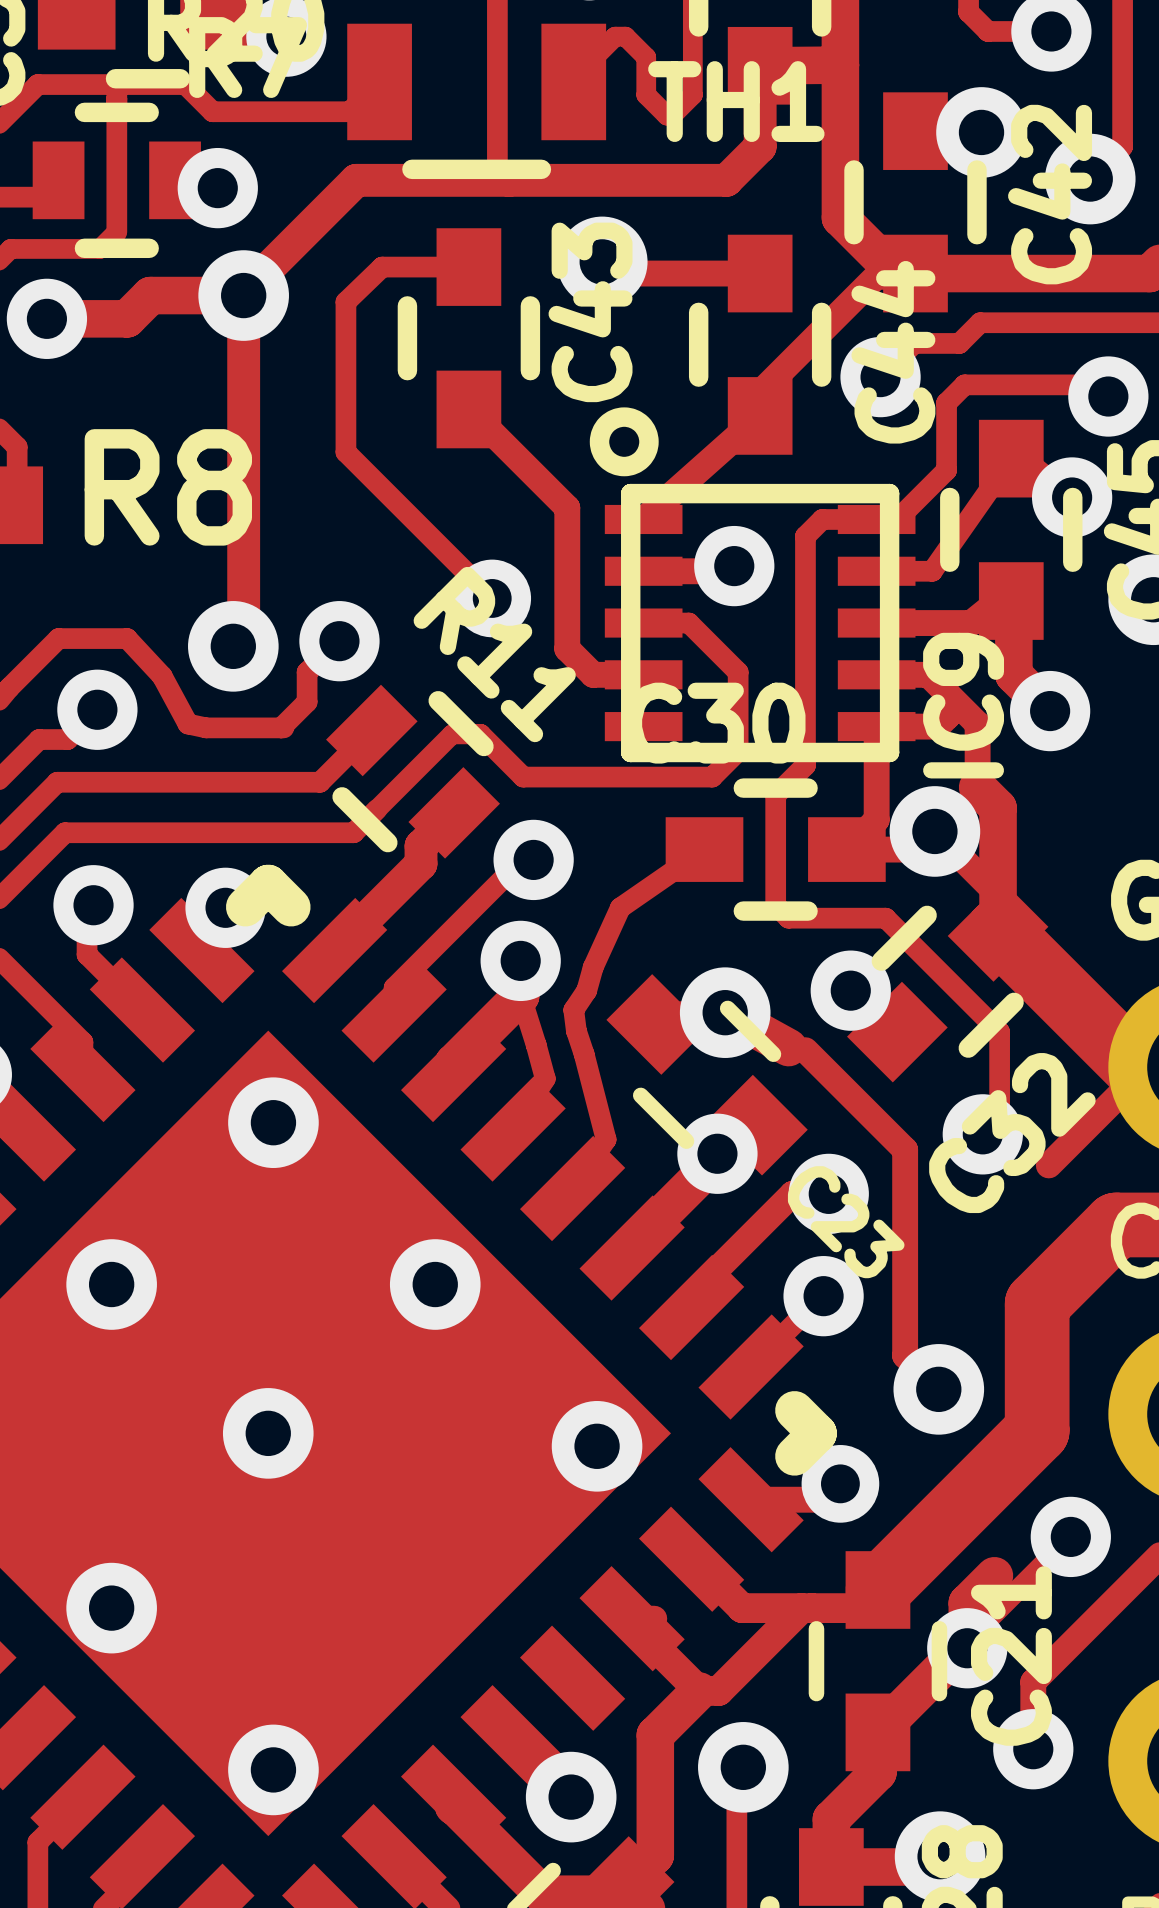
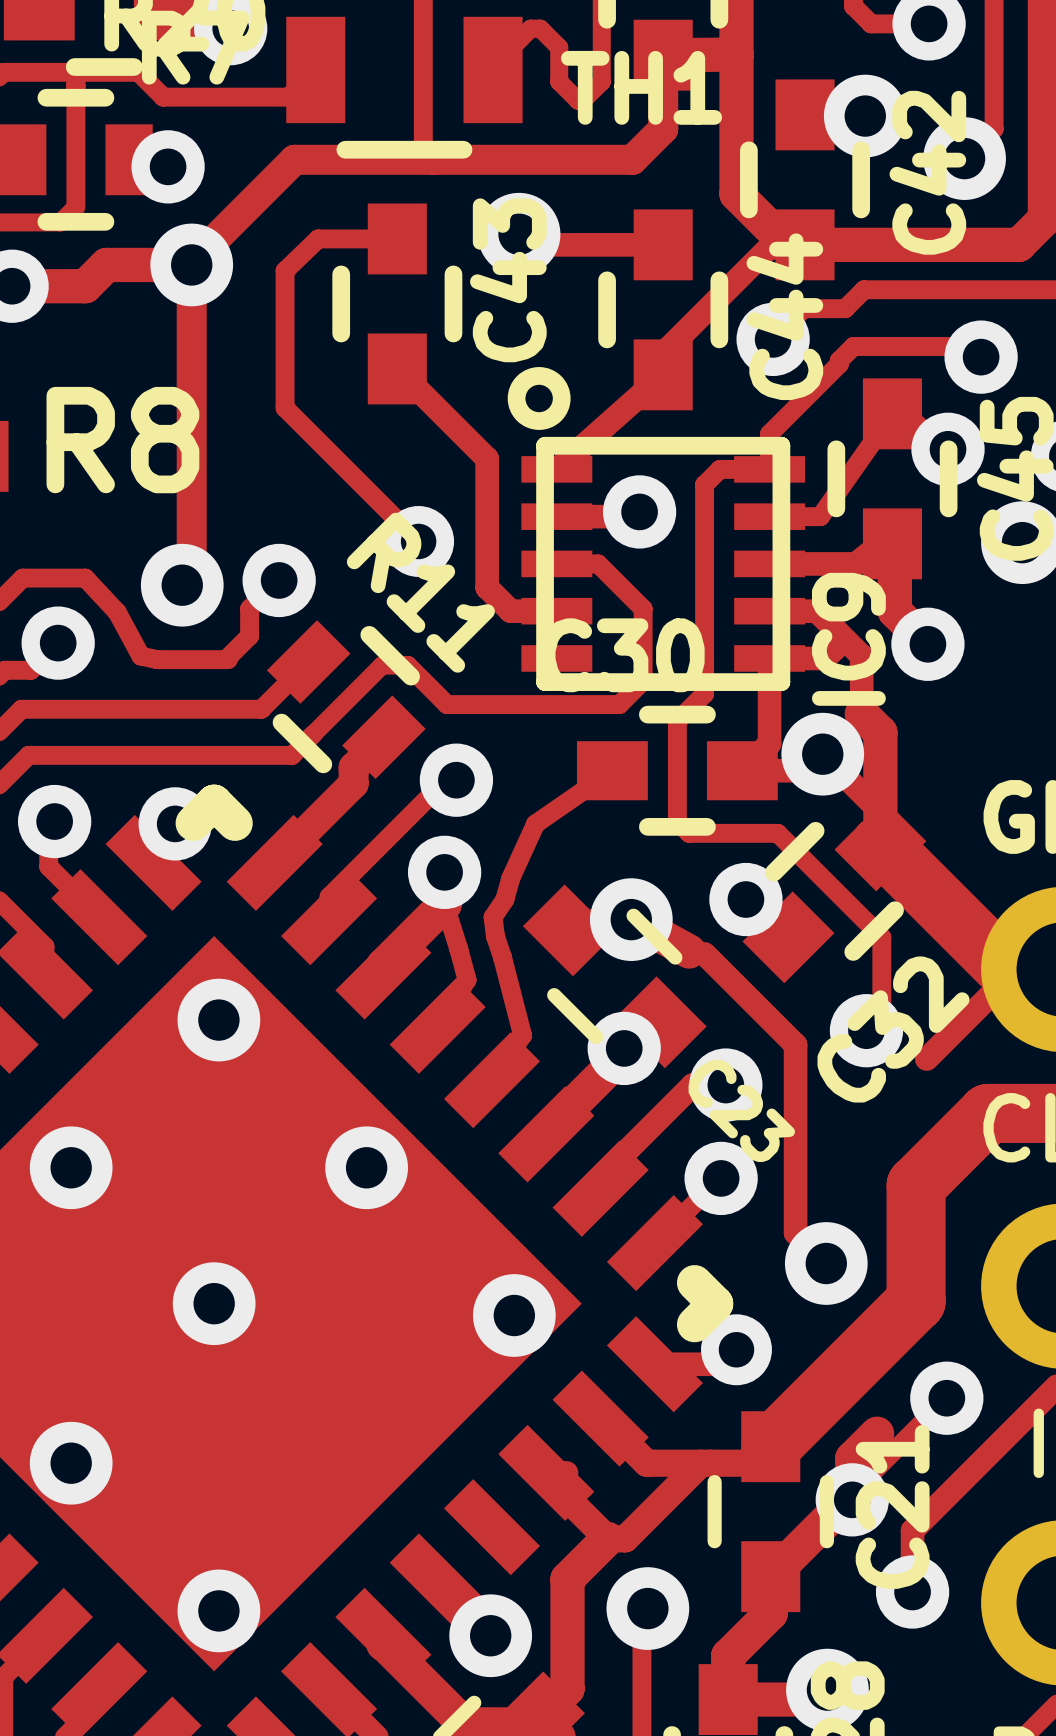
track: (968, 384) (964, 384) (946, 402) (946, 470) (897, 519) (876, 519) -> (853, 346) (839, 360) (839, 364) (769, 433) (769, 469)

